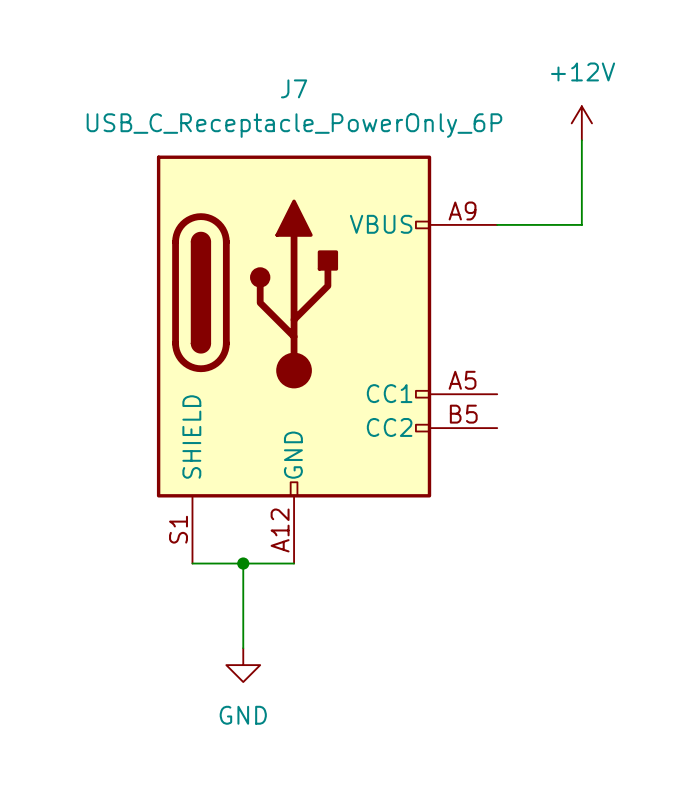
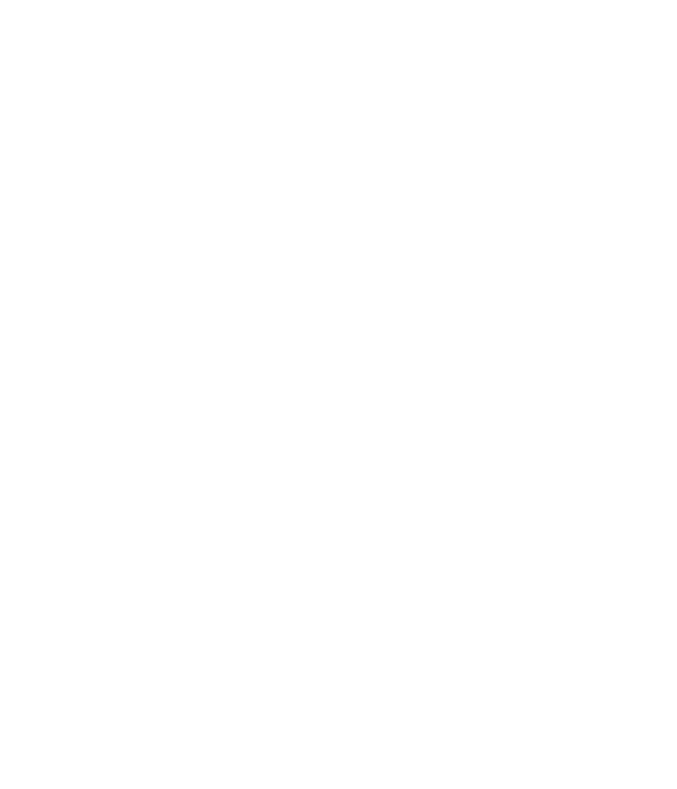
power symbol: +12V (581, 123) -> none
wire: (581, 140) (581, 224) (497, 224) -> none
J7: USB_C_Receptacle_PowerOnly_6P (327, 359) -> none
wire: (192, 563) (294, 563) -> none
wire: (243, 563) (243, 648) -> none
junction: (243, 563) -> none
power symbol: GND (243, 665) -> none

